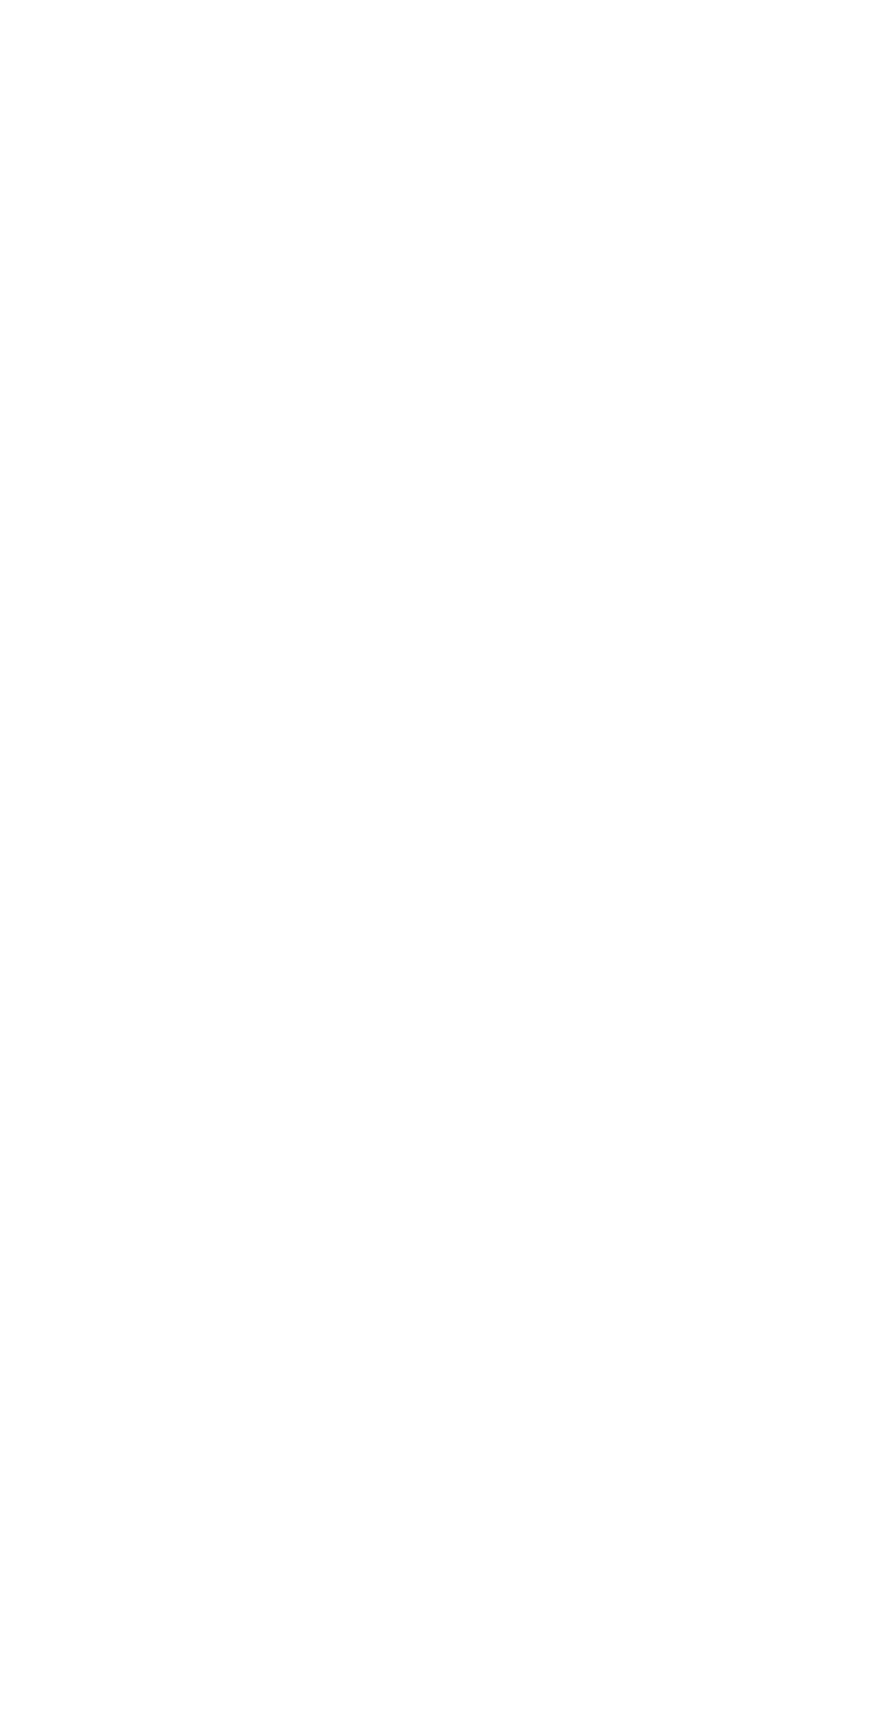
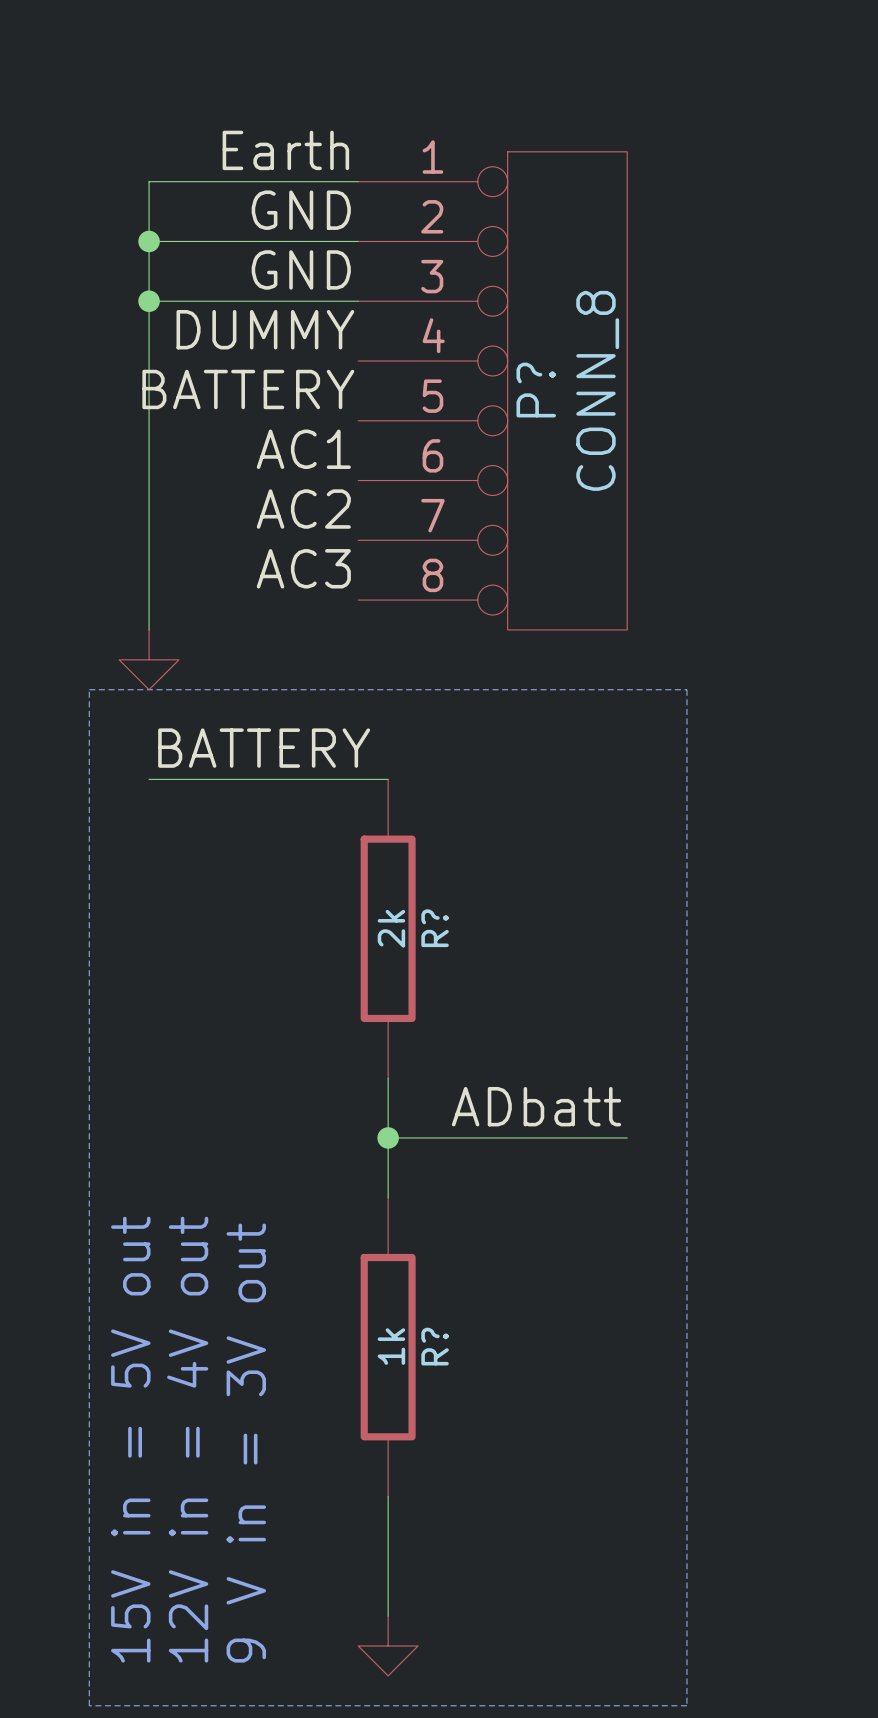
label: none -> Earth (285, 150)
wire: none -> (358, 181) (149, 181) (149, 629)
label: none -> GND (301, 210)
wire: none -> (149, 241) (358, 241)
junction: none -> (149, 241)
label: none -> GND (301, 269)
wire: none -> (149, 301) (358, 301)
junction: none -> (149, 301)
label: none -> DUMMY (265, 329)
label: none -> BATTERY (248, 389)
P?: none -> CONN_8 (492, 390)
label: none -> AC1 (303, 449)
label: none -> AC2 (303, 509)
label: none -> AC3 (303, 568)
power symbol: none -> (149, 659)
line: none -> (89, 689) (686, 689) (686, 1705) (89, 1705) (89, 689)
label: none -> BATTERY (264, 748)
wire: none -> (149, 779) (388, 779)
R?: none -> 2k (388, 928)
wire: none -> (388, 1078) (388, 1197)
label: none -> ADbatt (536, 1106)
wire: none -> (388, 1137) (627, 1137)
junction: none -> (388, 1137)
R?: none -> 1k (388, 1347)
text: none -> 15V in = 5V out (130, 1439)
text: none -> 12V in = 4V out (187, 1439)
text: none -> 9 V in = 3V out (246, 1443)
wire: none -> (388, 1496) (388, 1616)
power symbol: none -> (388, 1646)

